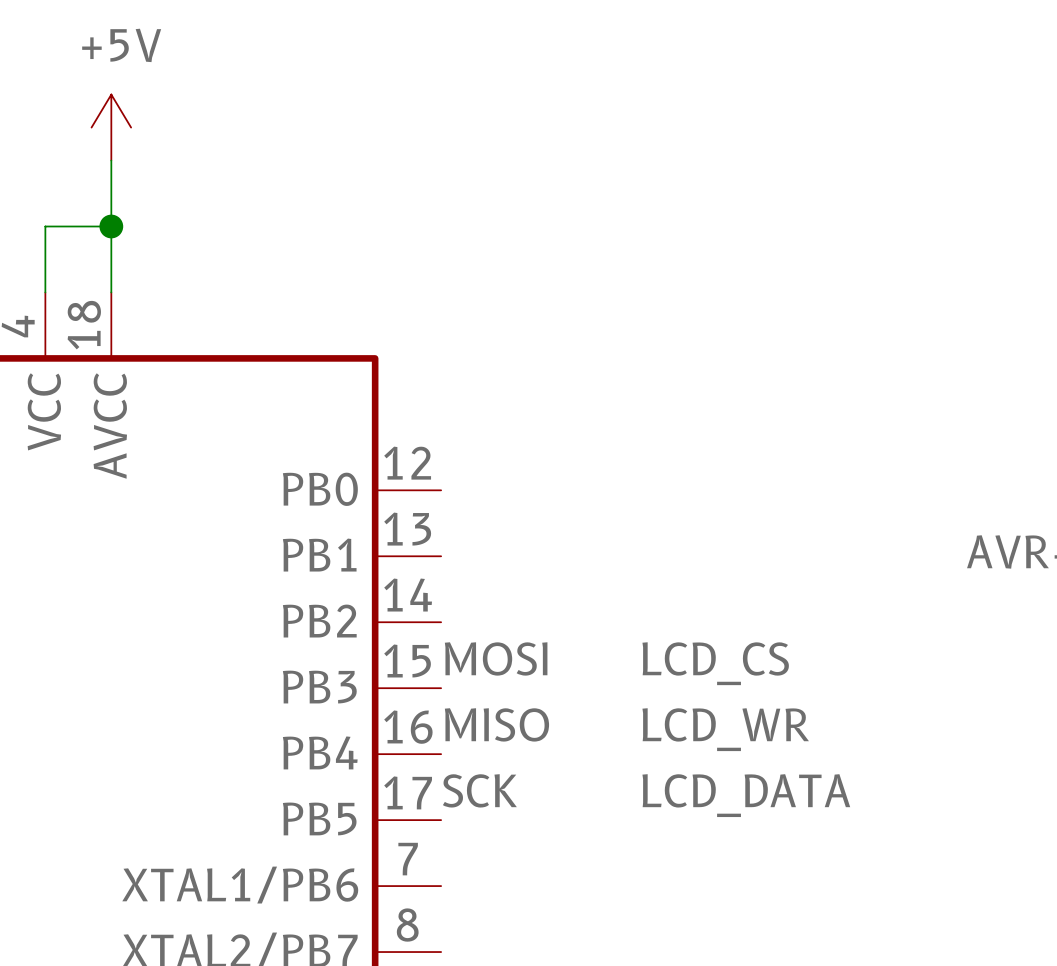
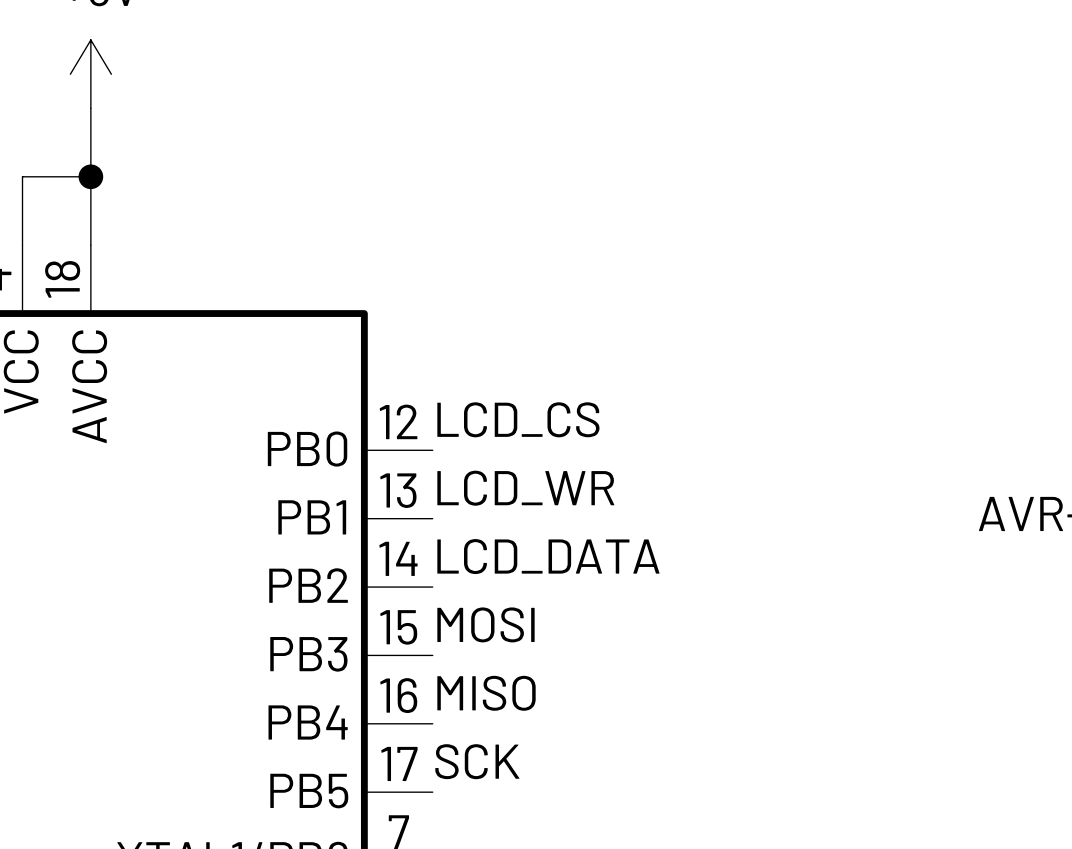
label position: LCD_CS (715, 663) -> LCD_CS (518, 419)
label position: LCD_WR (725, 729) -> LCD_WR (525, 488)
label position: LCD_DATA (746, 795) -> LCD_DATA (548, 556)

